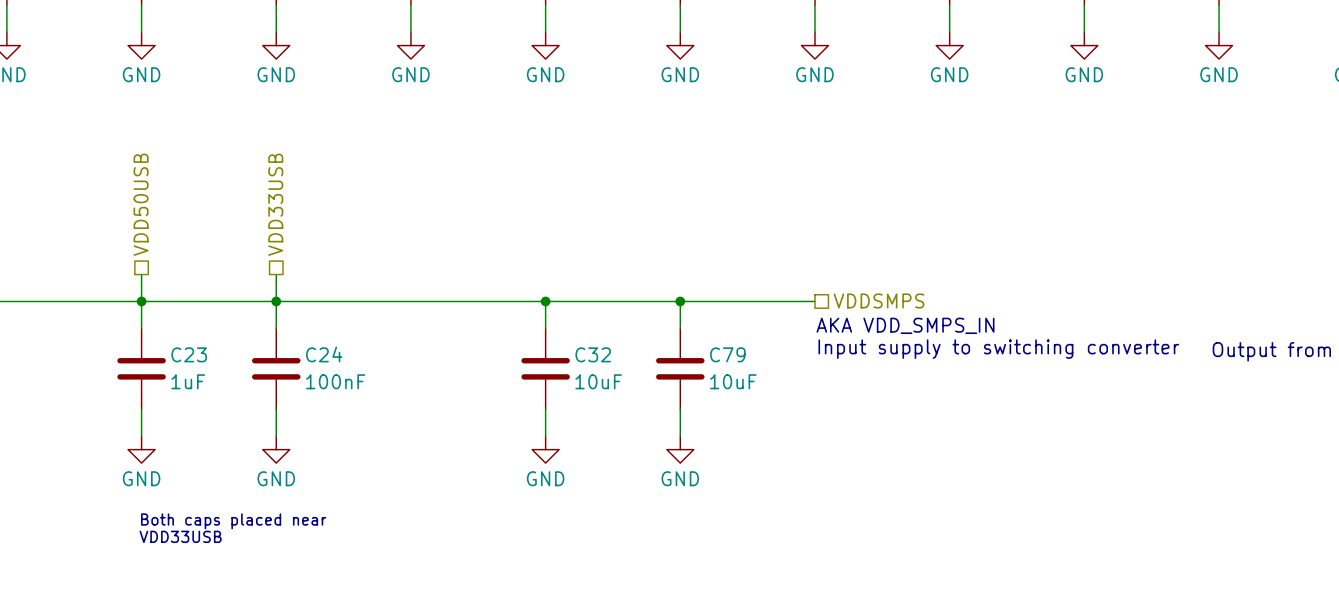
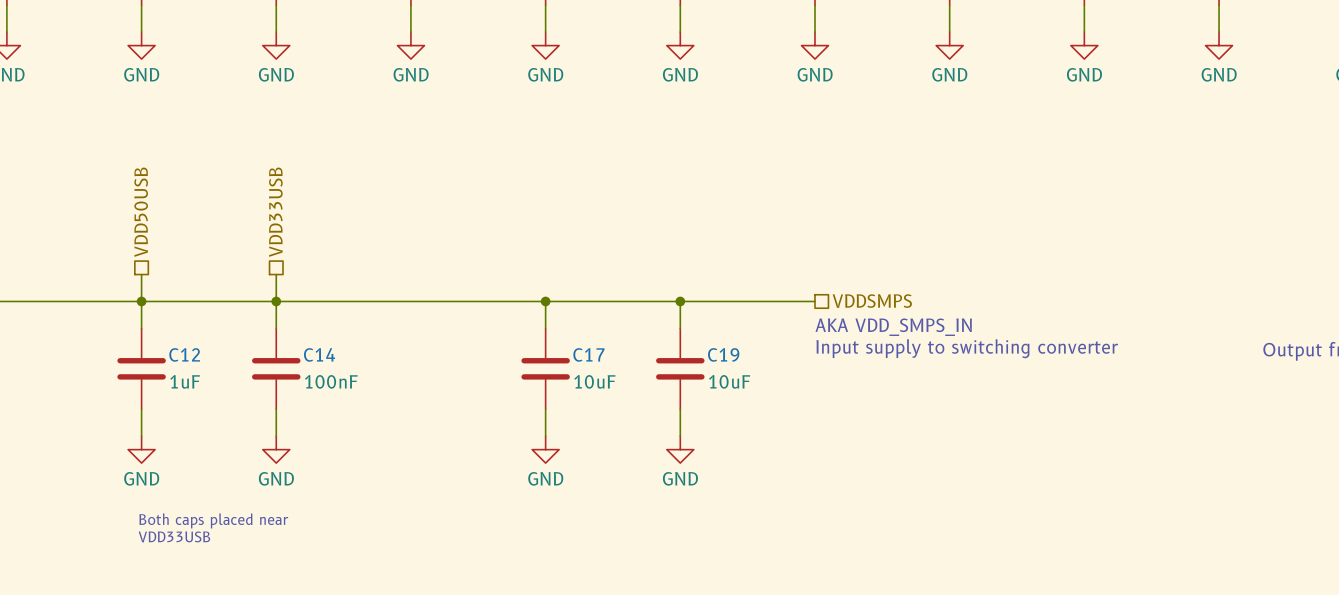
C23 name: C23 (189, 354) -> C12 (184, 354)
C24 name: C24 (324, 354) -> C14 (319, 354)
C32 name: C32 (593, 354) -> C17 (588, 354)
C79 name: C79 (727, 354) -> C19 (723, 354)

